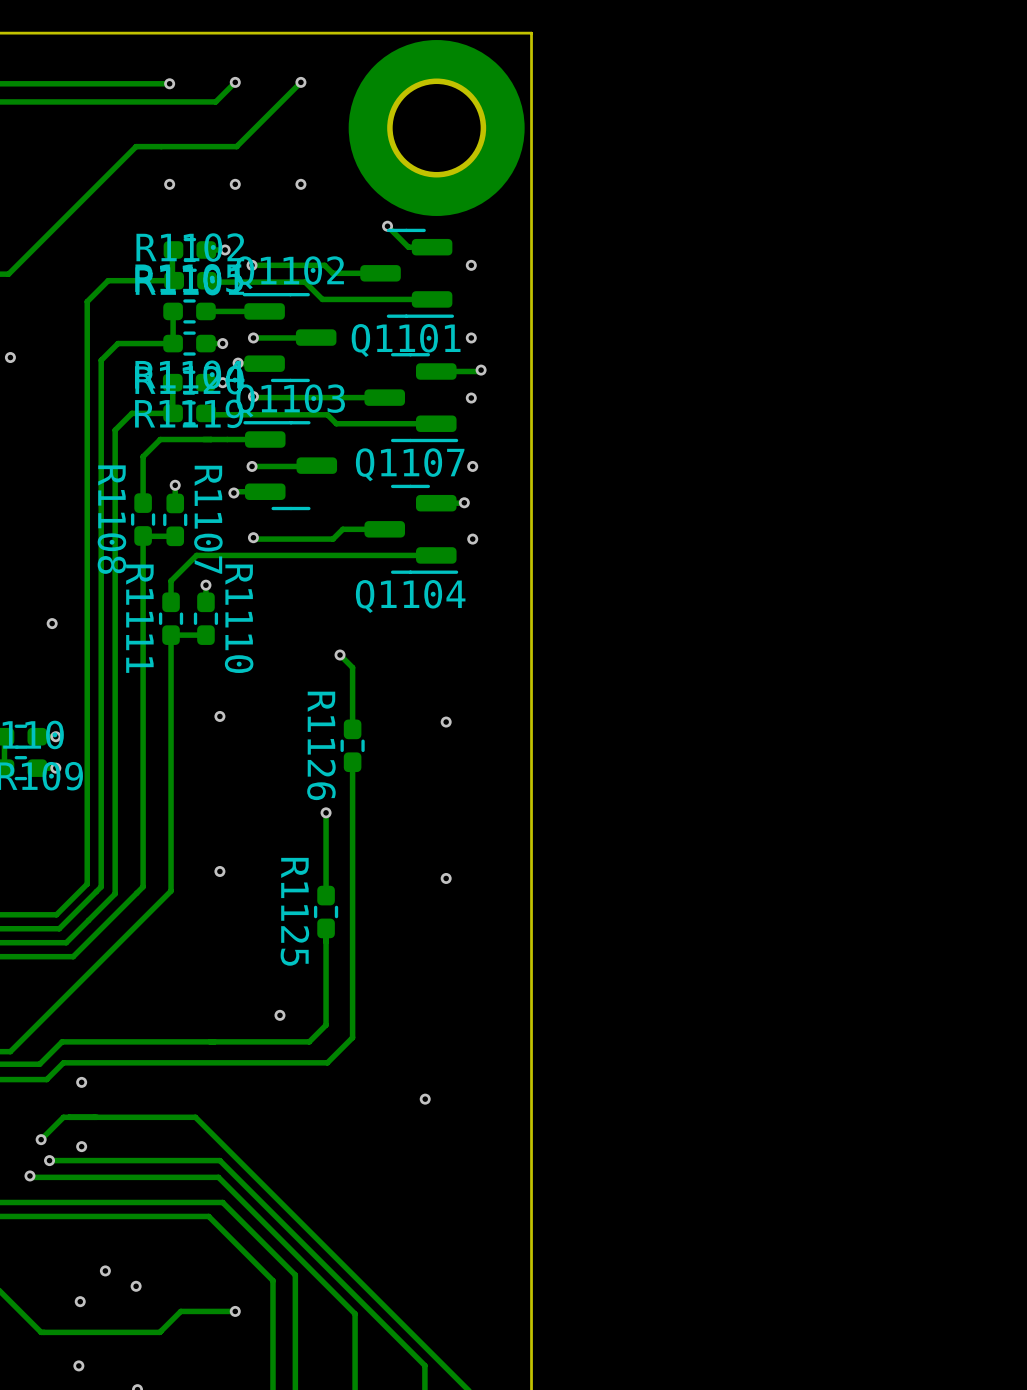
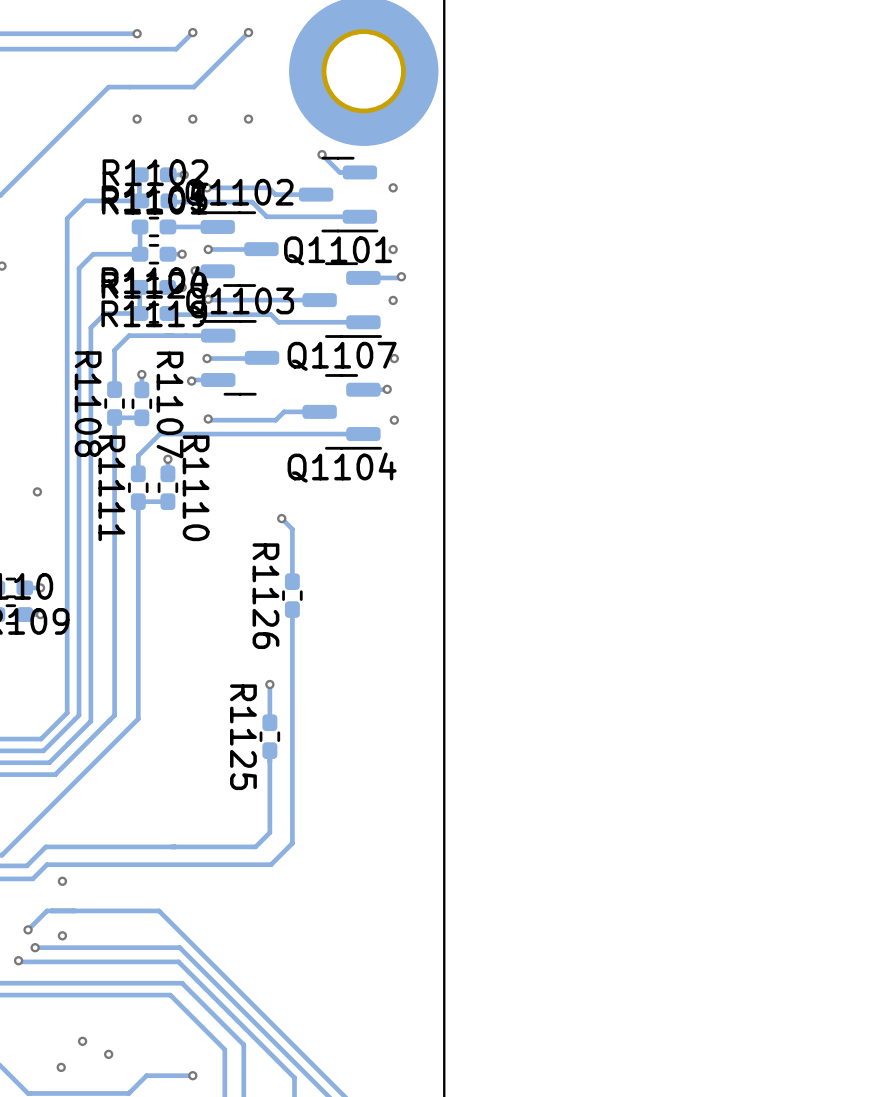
via: (219, 716) -> none
via: (446, 722) -> none
track: (326, 812) (326, 850) -> none
via position: (326, 812) -> (269, 684)
via: (219, 871) -> none
via: (446, 878) -> none
via: (279, 1015) -> none
via: (425, 1099) -> none

